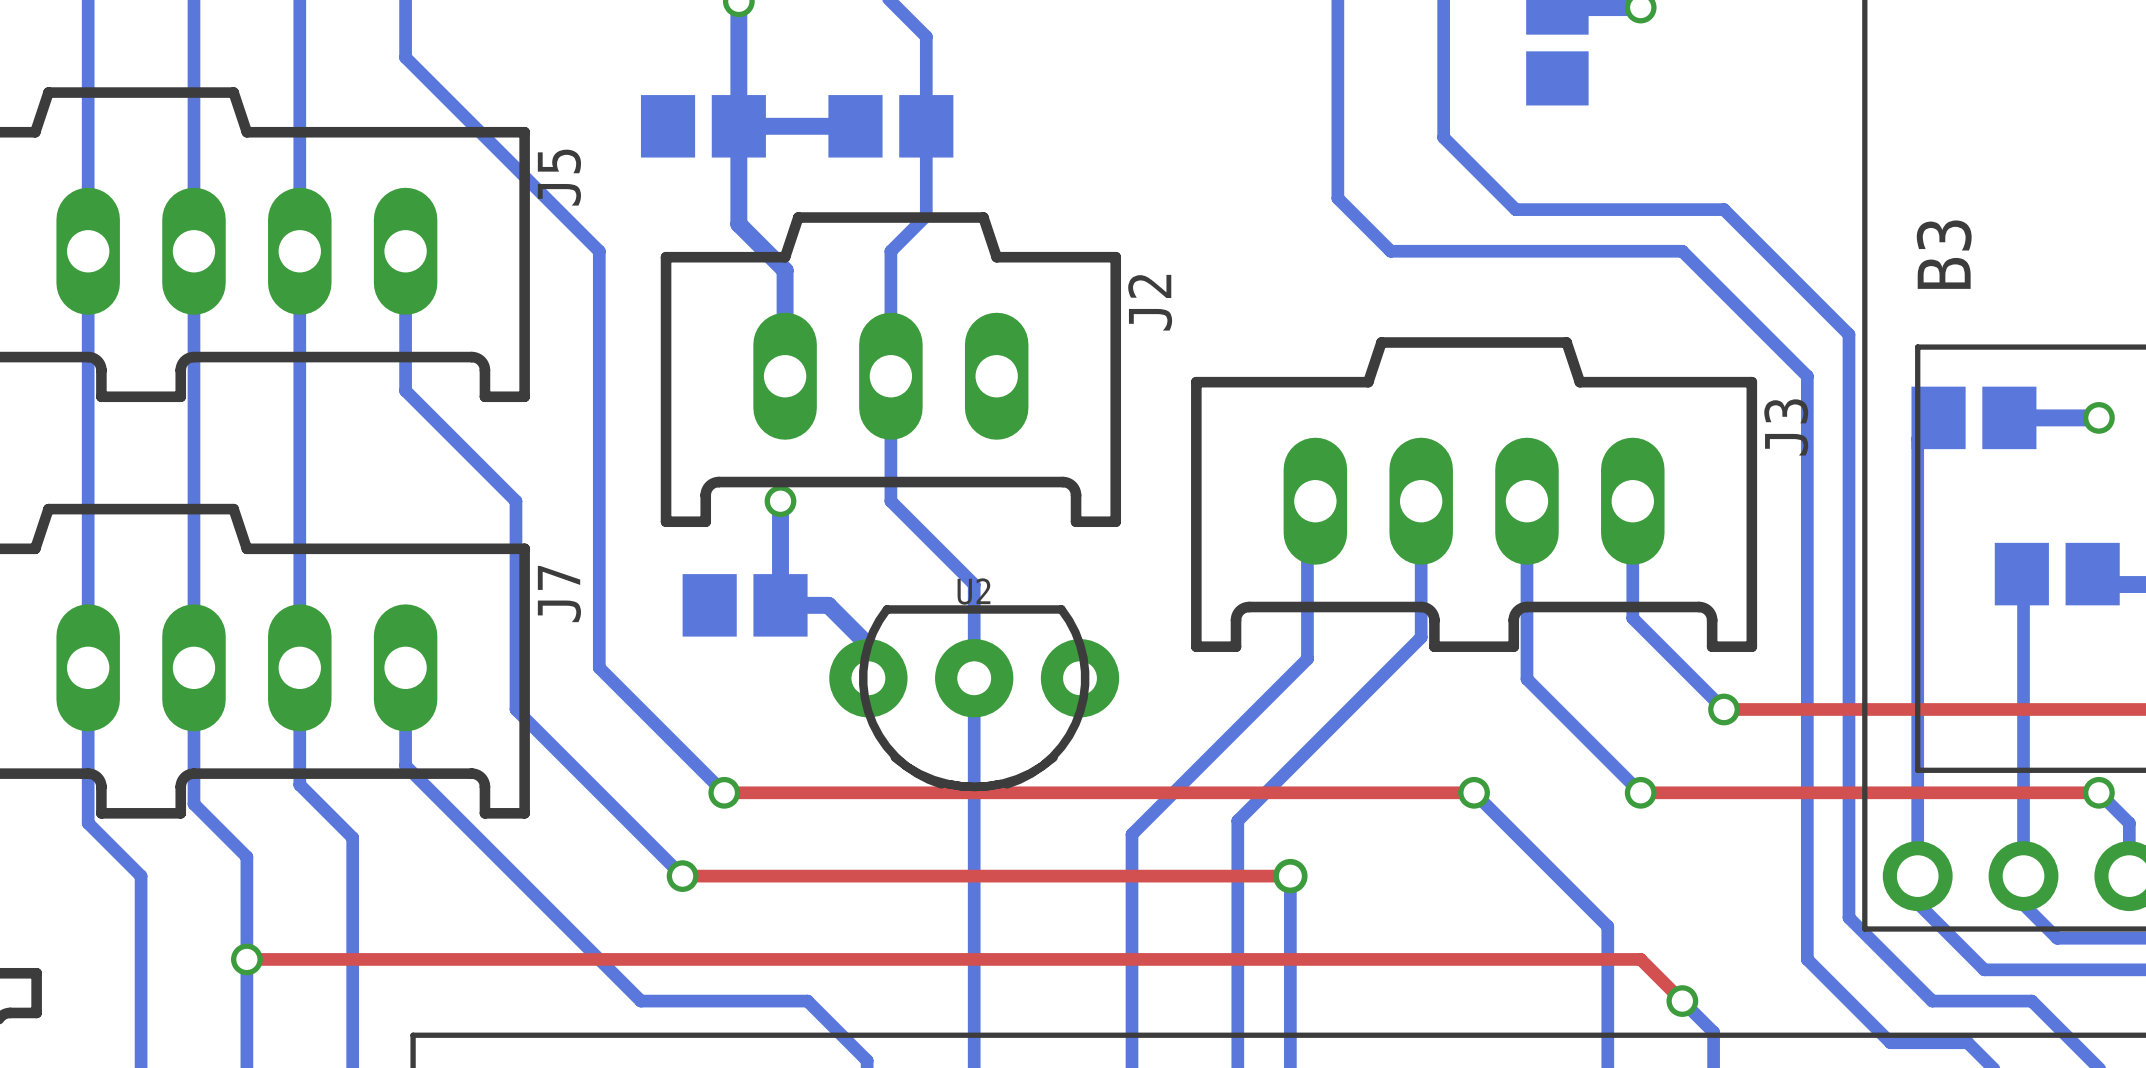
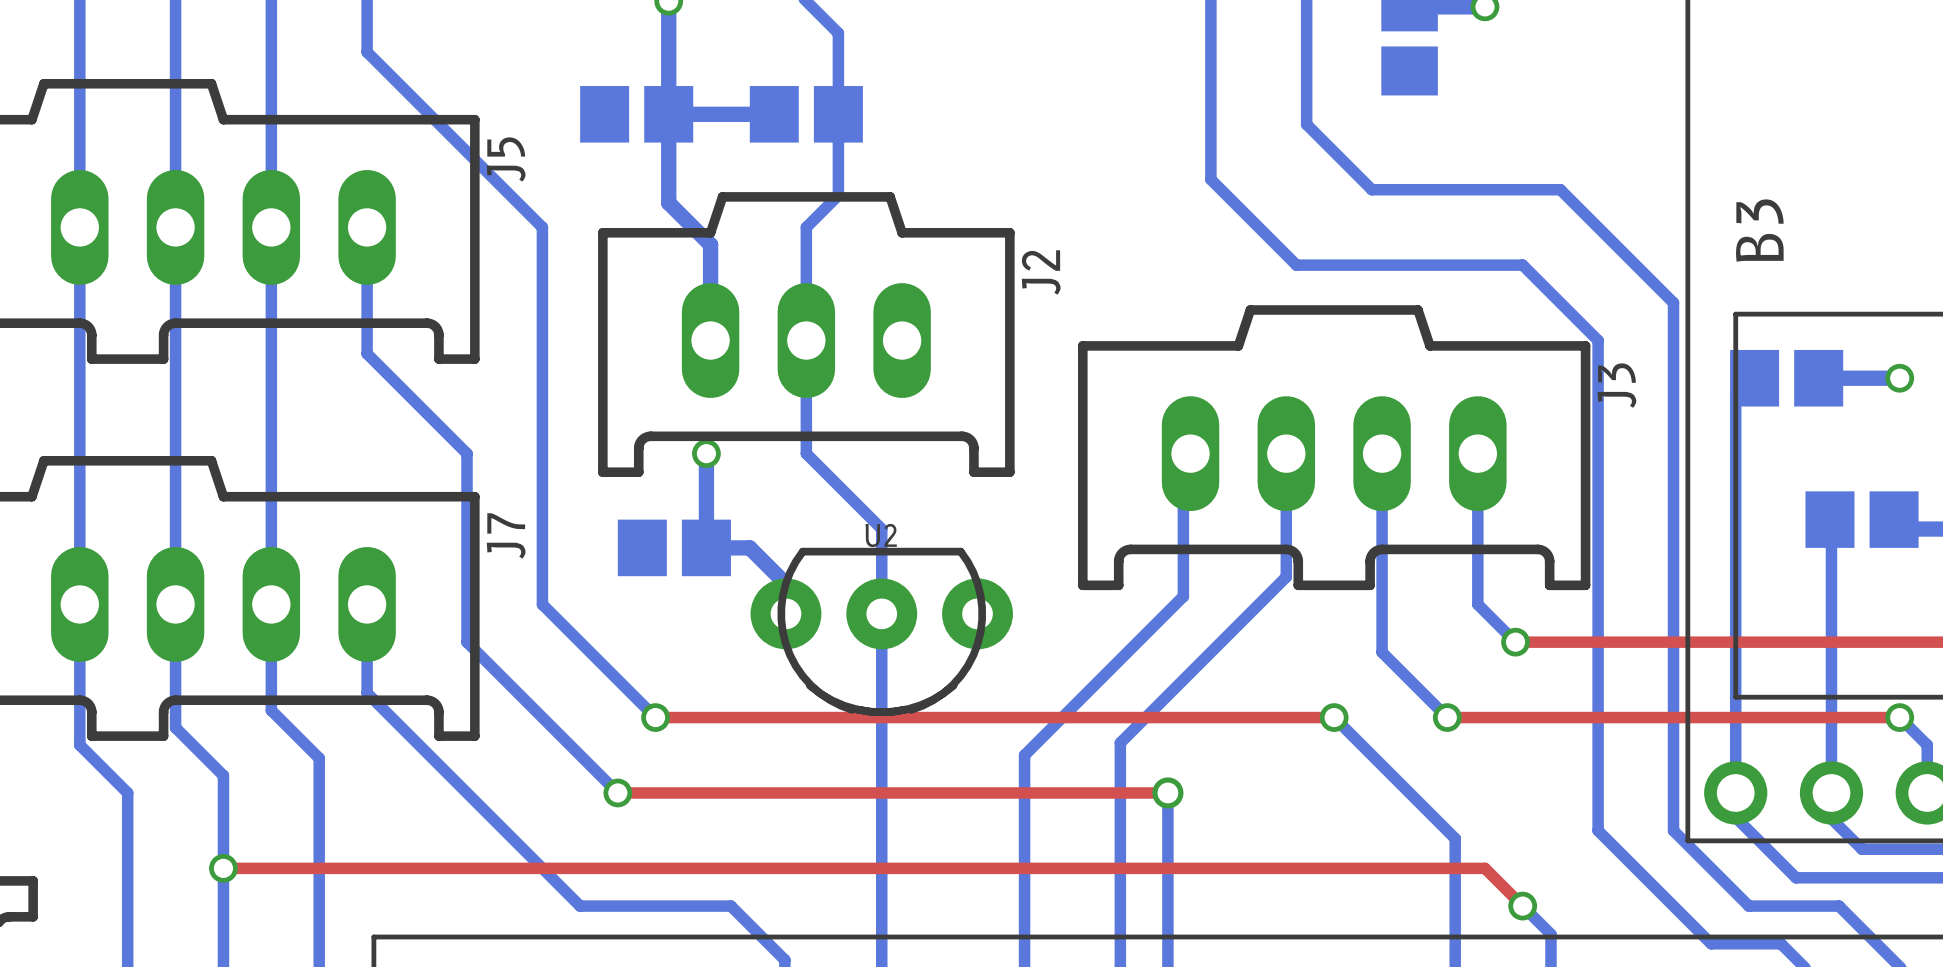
bottom track: (1390, 251) (1682, 251) (1807, 376) (1807, 959) -> (1258, 227) (1296, 265) (1522, 265) (1598, 340) (1598, 830) (1635, 868)
bottom track: (1632, 618) (1724, 709) -> (1477, 559) (1477, 604) (1515, 642)
bottom track: (1526, 679) (1640, 792) -> (1382, 614) (1382, 652) (1447, 717)
top track: none -> (1515, 642) (1560, 642)
via: none -> (1515, 642)
via: (1724, 709) -> none
top track: none -> (1447, 717) (1485, 717)
via position: (1640, 792) -> (1447, 717)

